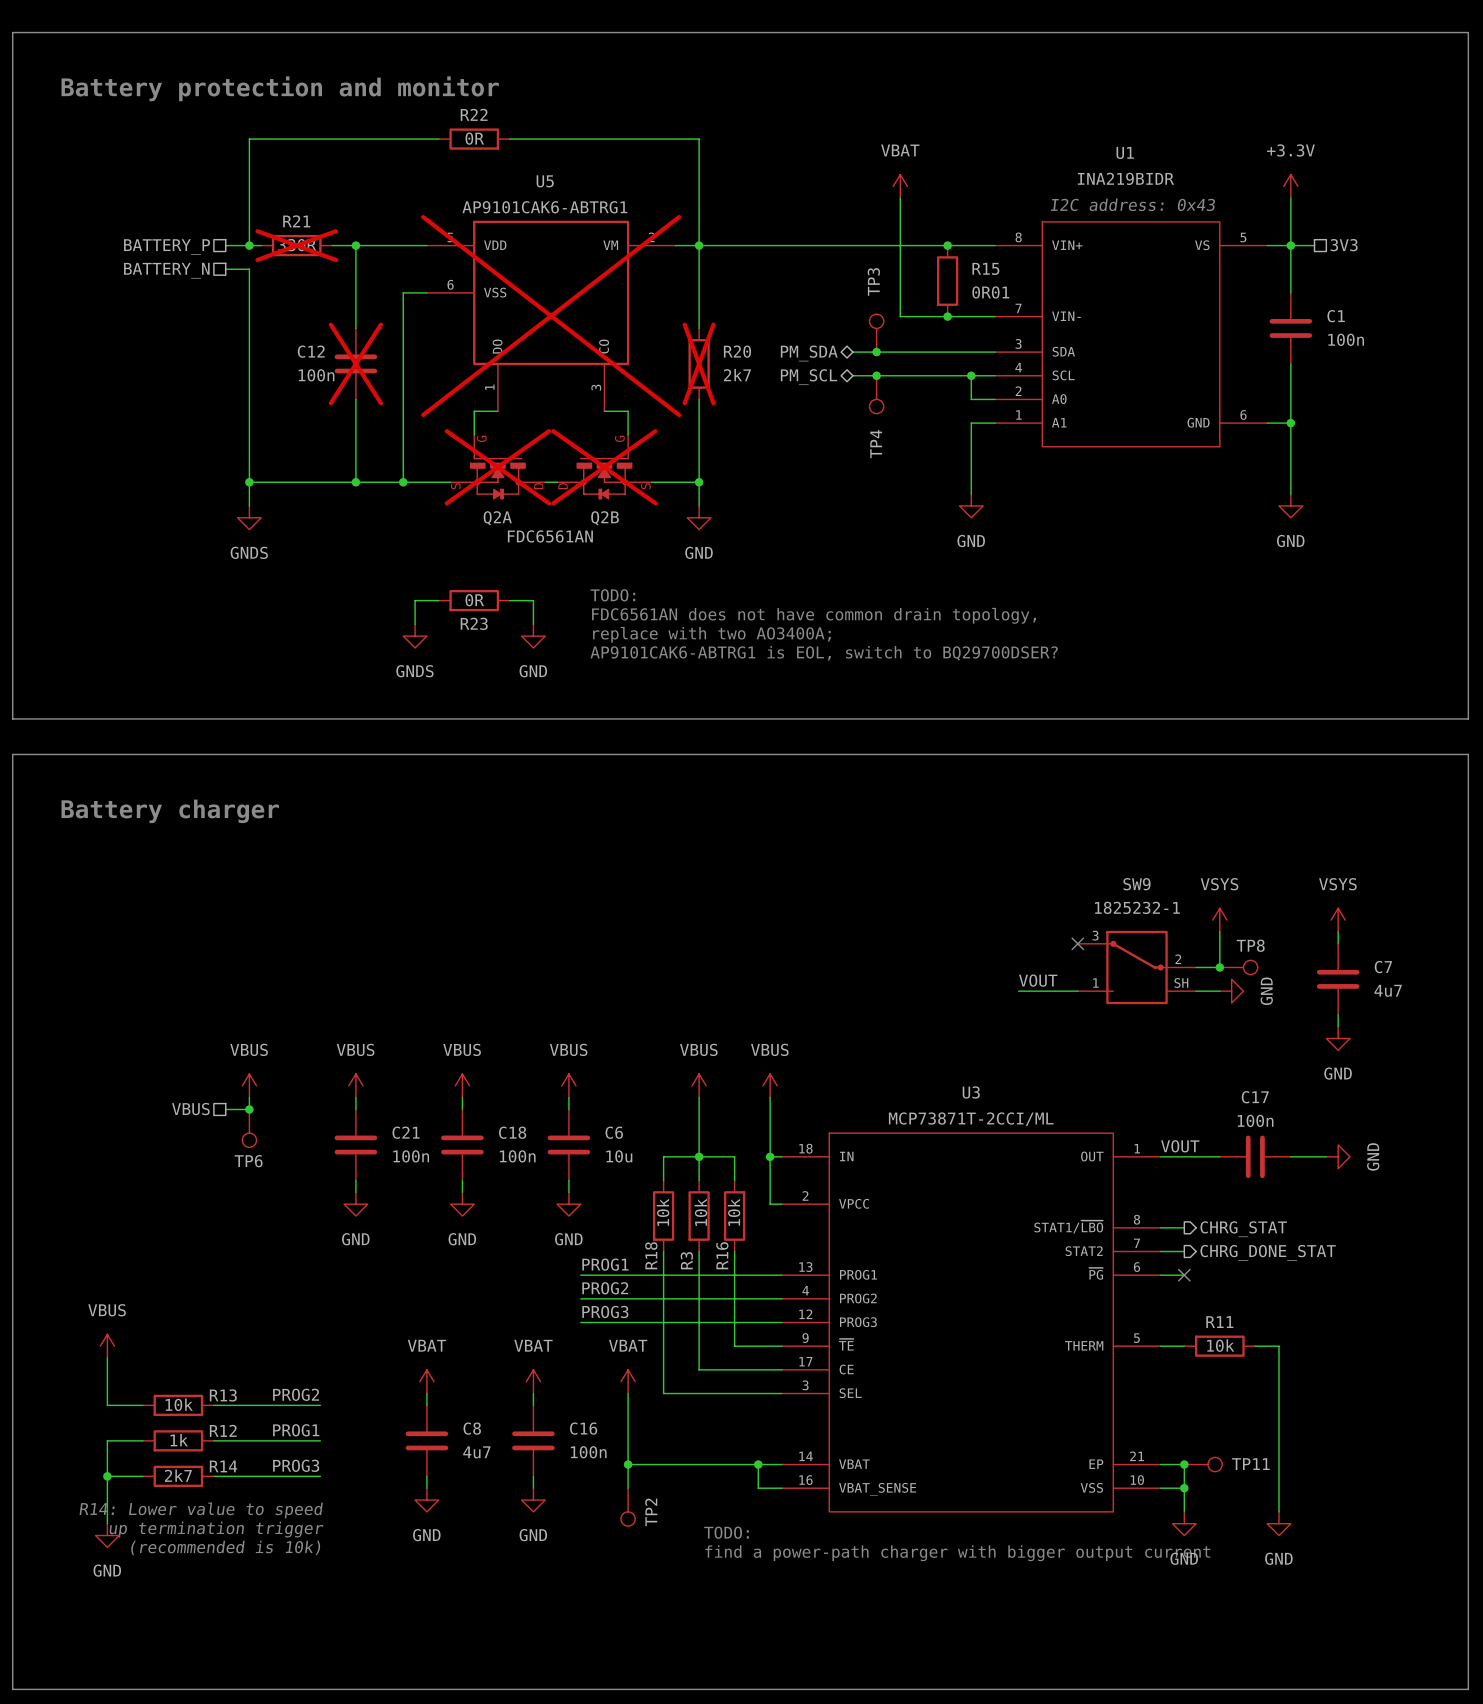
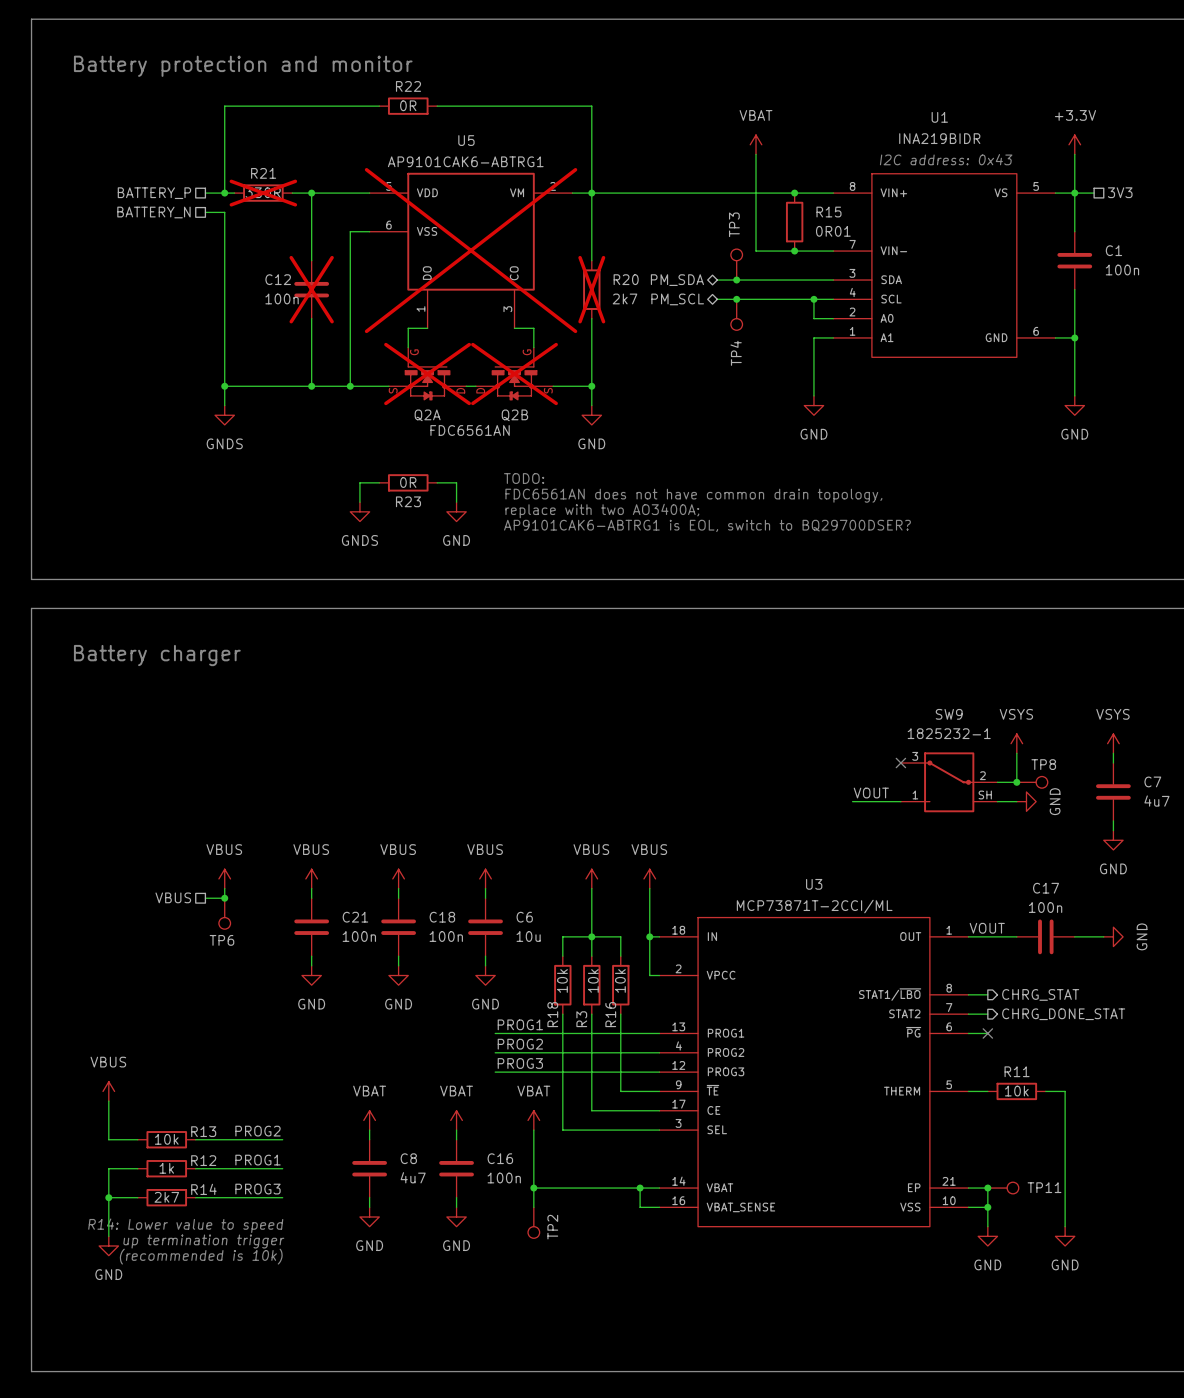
text: TODO: (726, 1532) -> none
text: find a power-path charger with bigger output current (957, 1553) -> none

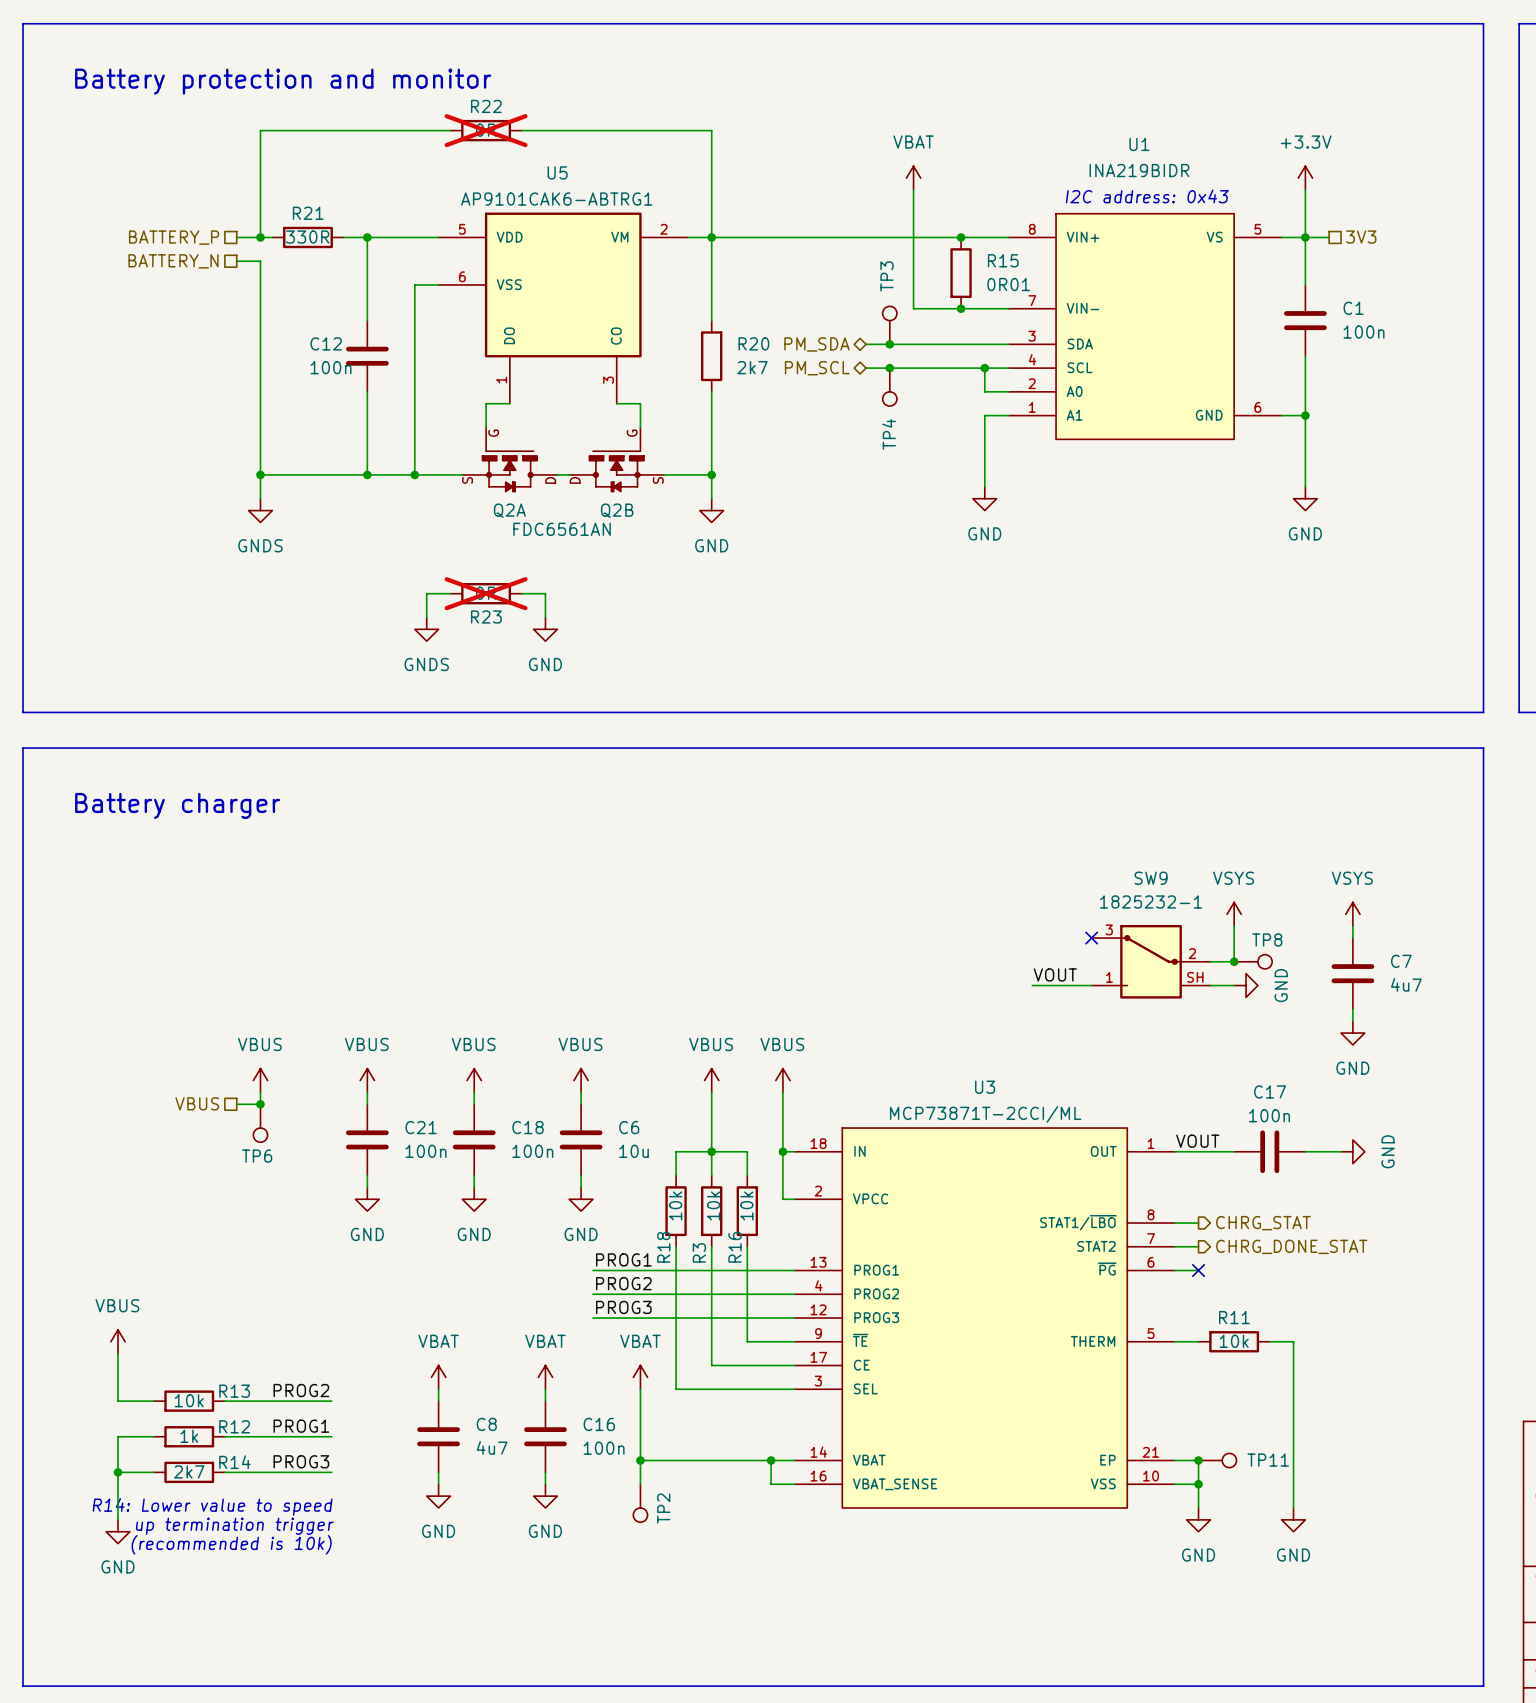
R22 do-not-place cross: none -> (486, 130)
R21 do-not-place cross: (263, 193) -> none
U5 do-not-place cross: (471, 250) -> none
C12 do-not-place cross: (311, 289) -> none
R20 do-not-place cross: (591, 289) -> none
Q2A do-not-place cross: (427, 374) -> none
Q2B do-not-place cross: (514, 374) -> none
text: TODO: (524, 478) -> none
R23 do-not-place cross: none -> (486, 593)
text: FDC6561AN does not have common drain topology, (693, 495) -> none
text: replace with two AO3400A; (602, 511) -> none
text: AP9101CAK6-ABTRG1 is EOL, switch to BQ29700DSER? (707, 525) -> none

